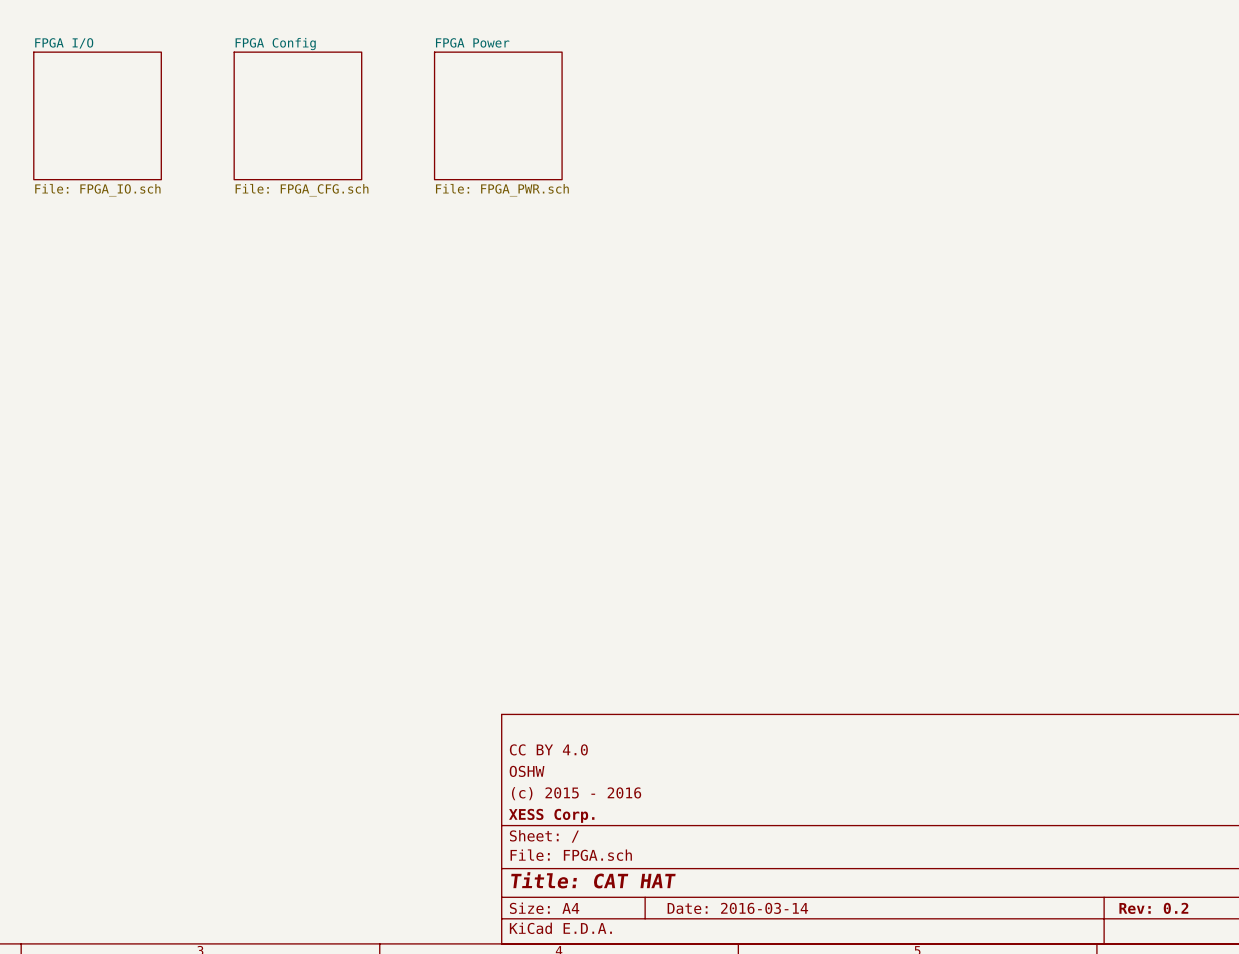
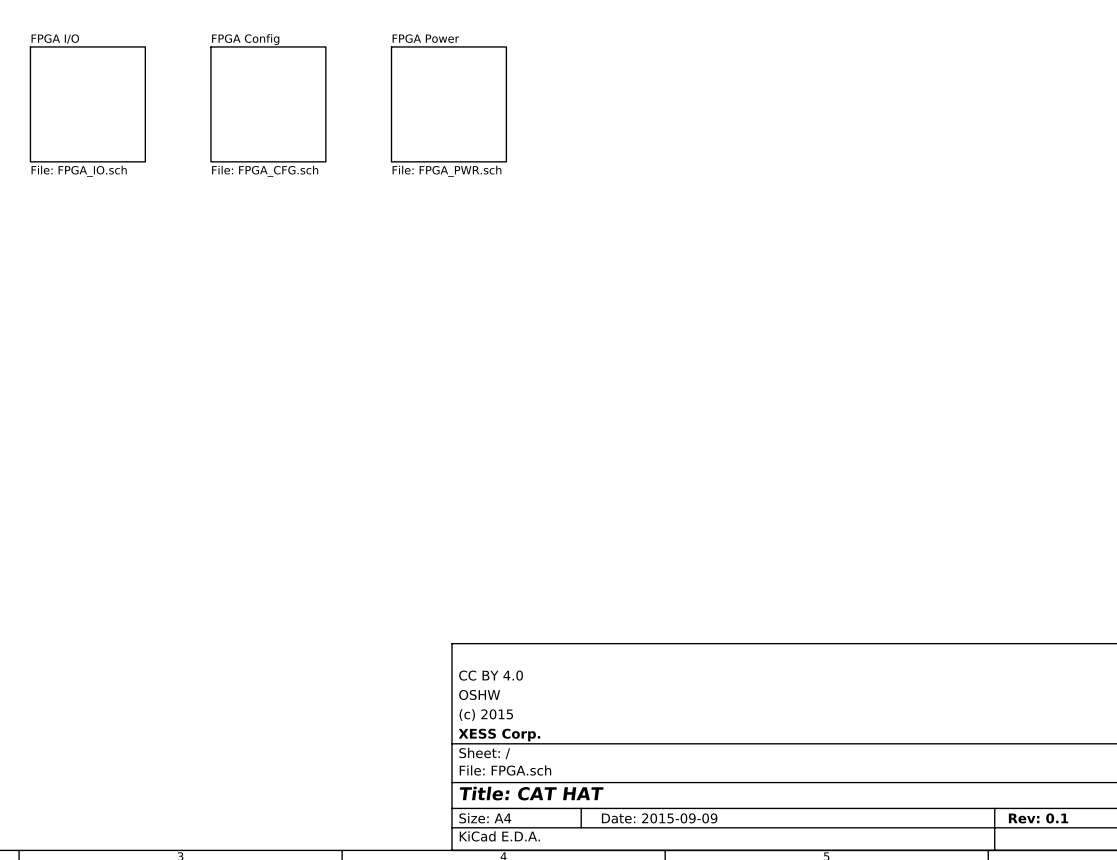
title block: (c) 2015 - 2016 (576, 793) -> (c) 2015 (486, 715)
title block: Date: 2016-03-14 (737, 908) -> Date: 2015-09-09 (659, 818)
title block: Rev: 0.2 (1153, 908) -> Rev: 0.1 (1038, 818)

